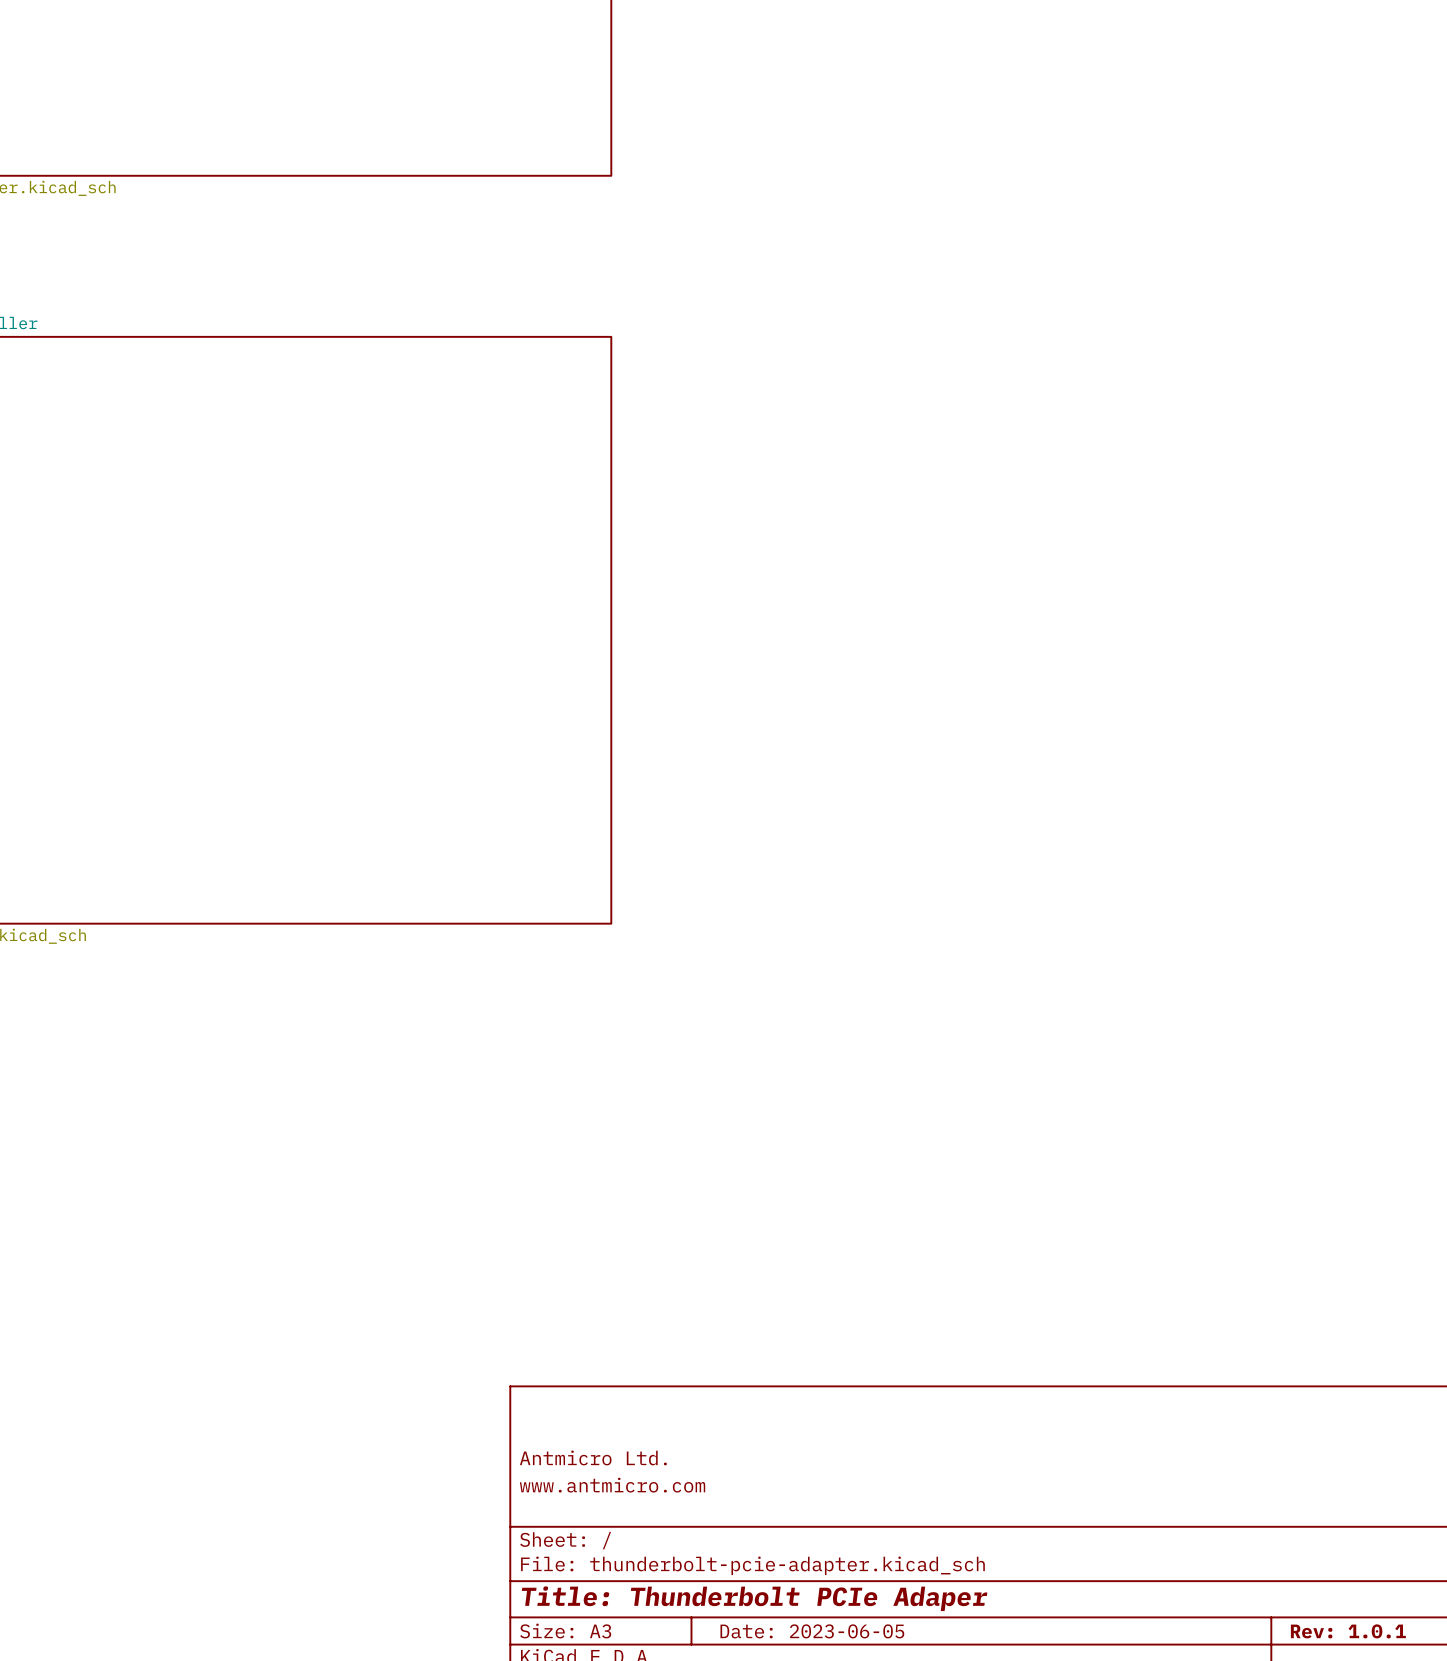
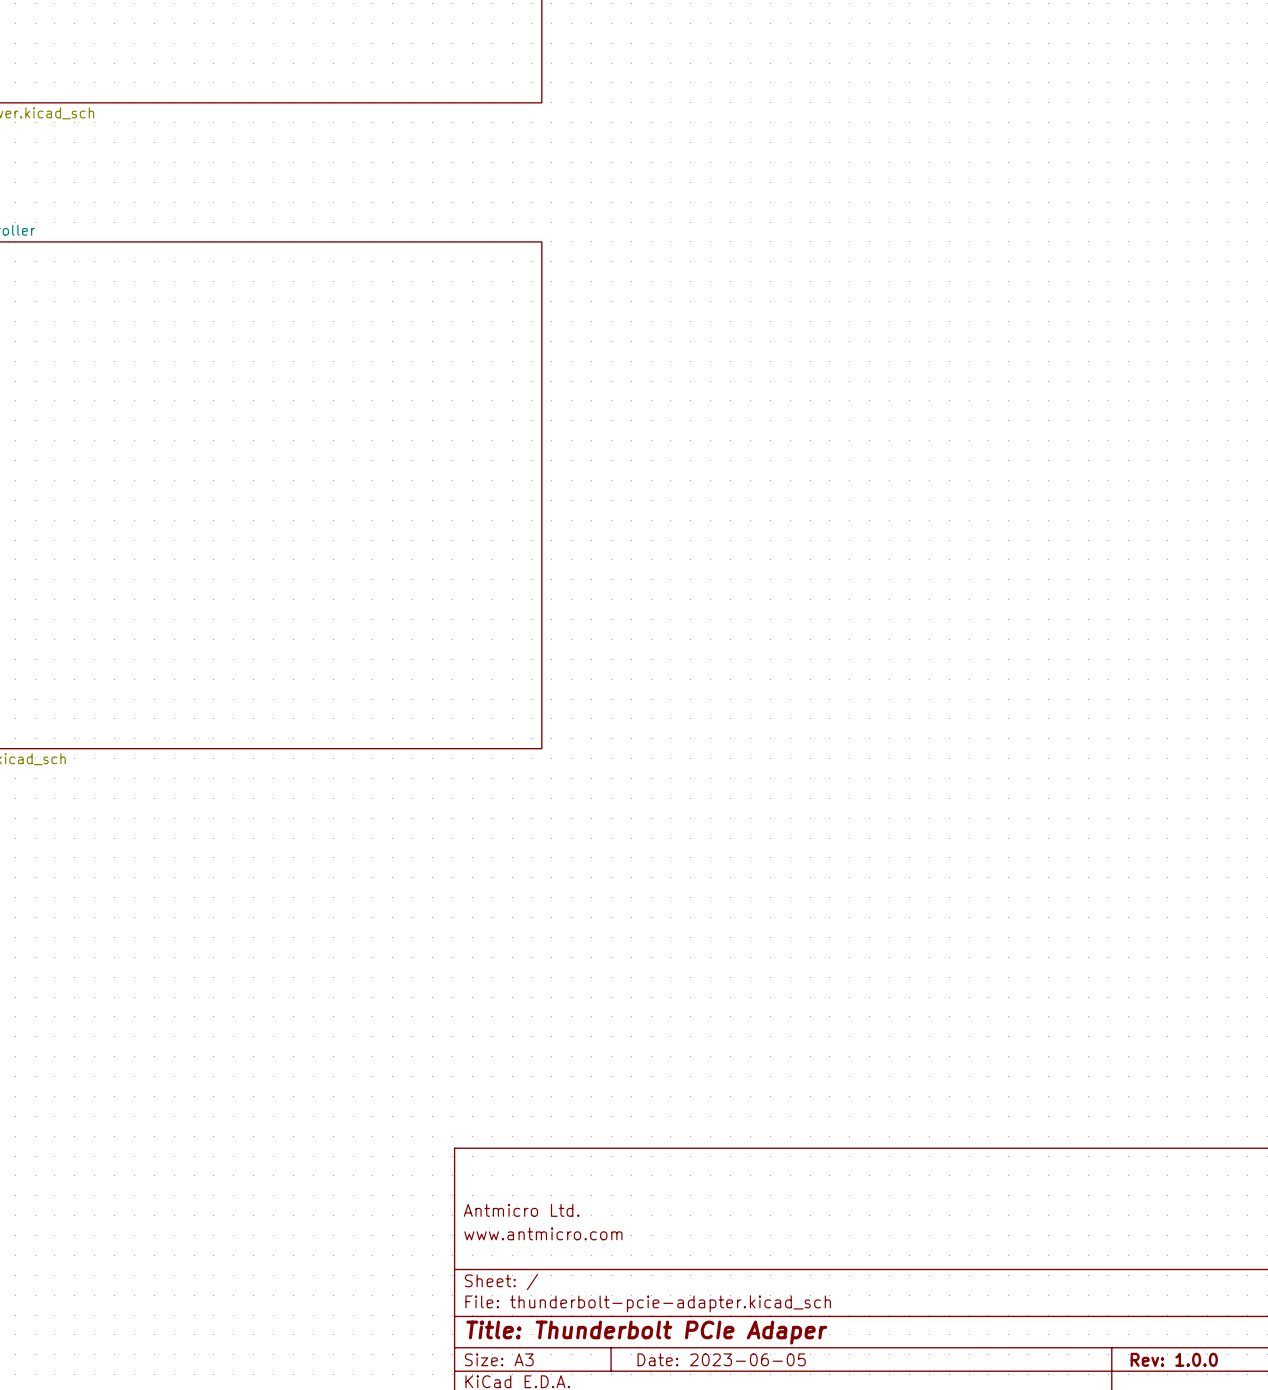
title block: Rev: 1.0.1 (1348, 1631) -> Rev: 1.0.0 (1174, 1359)

